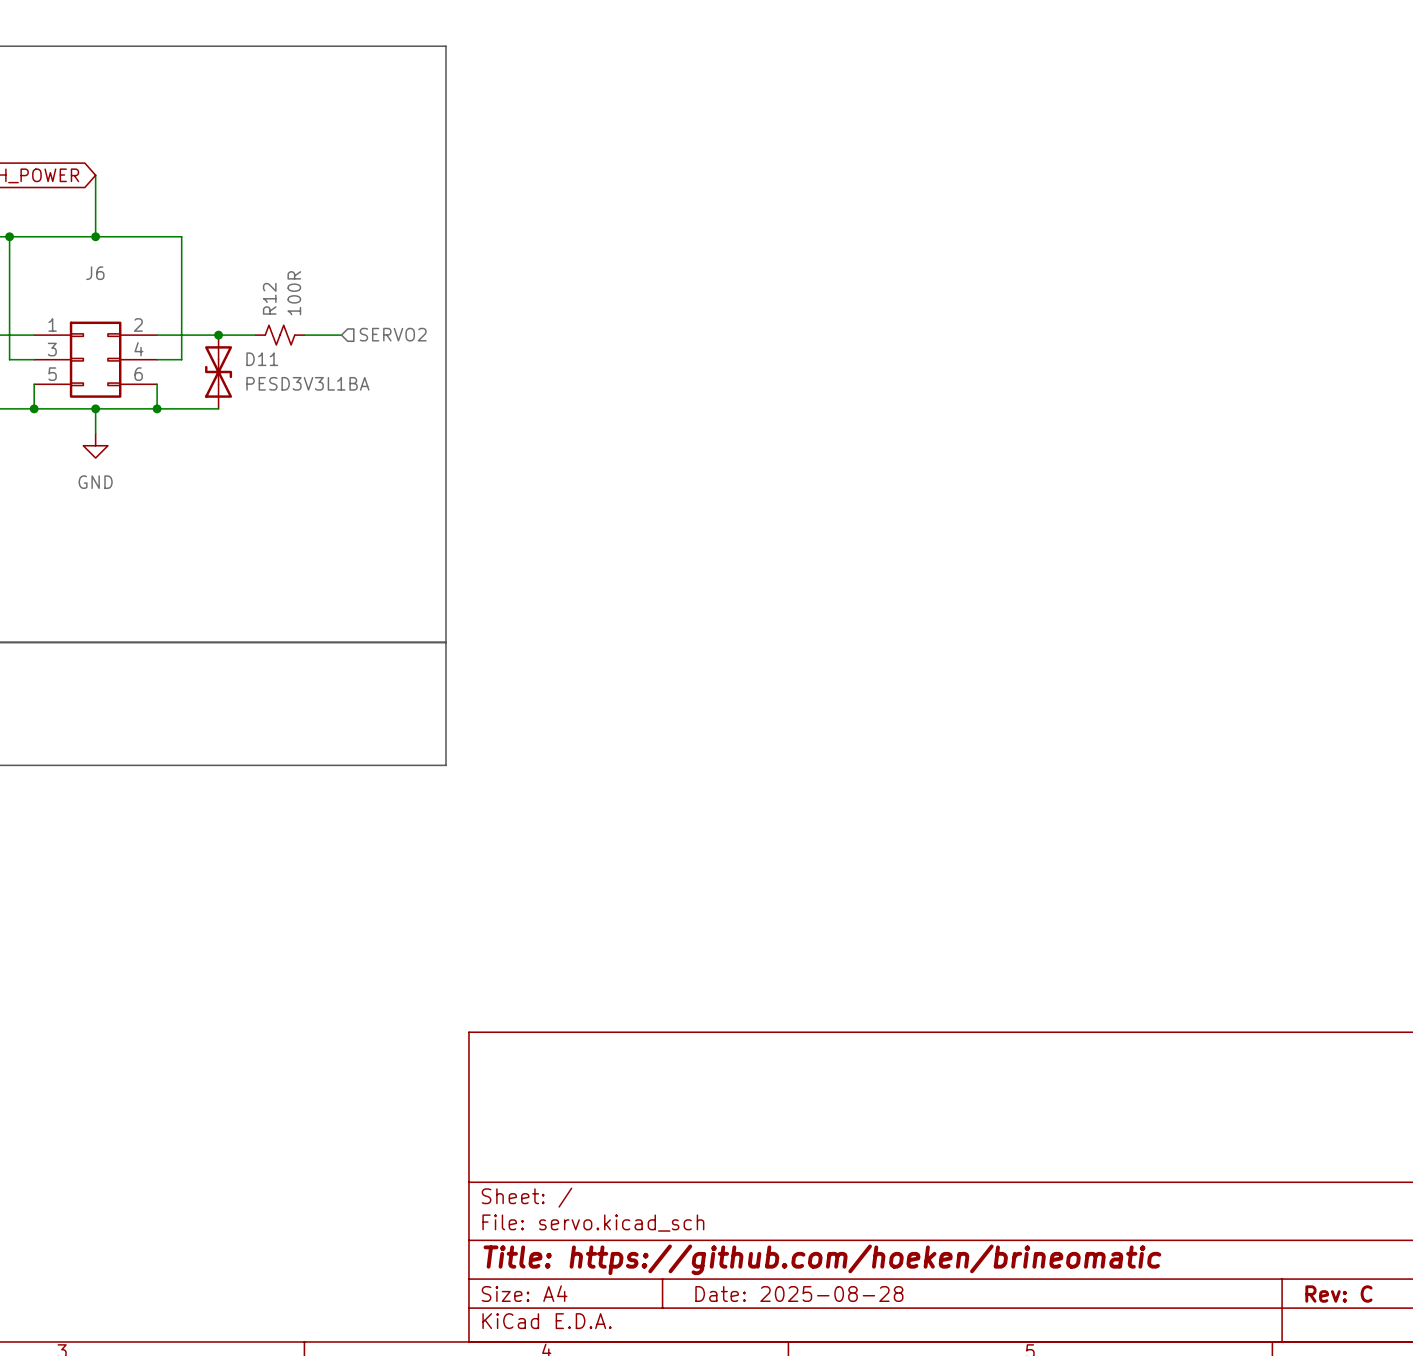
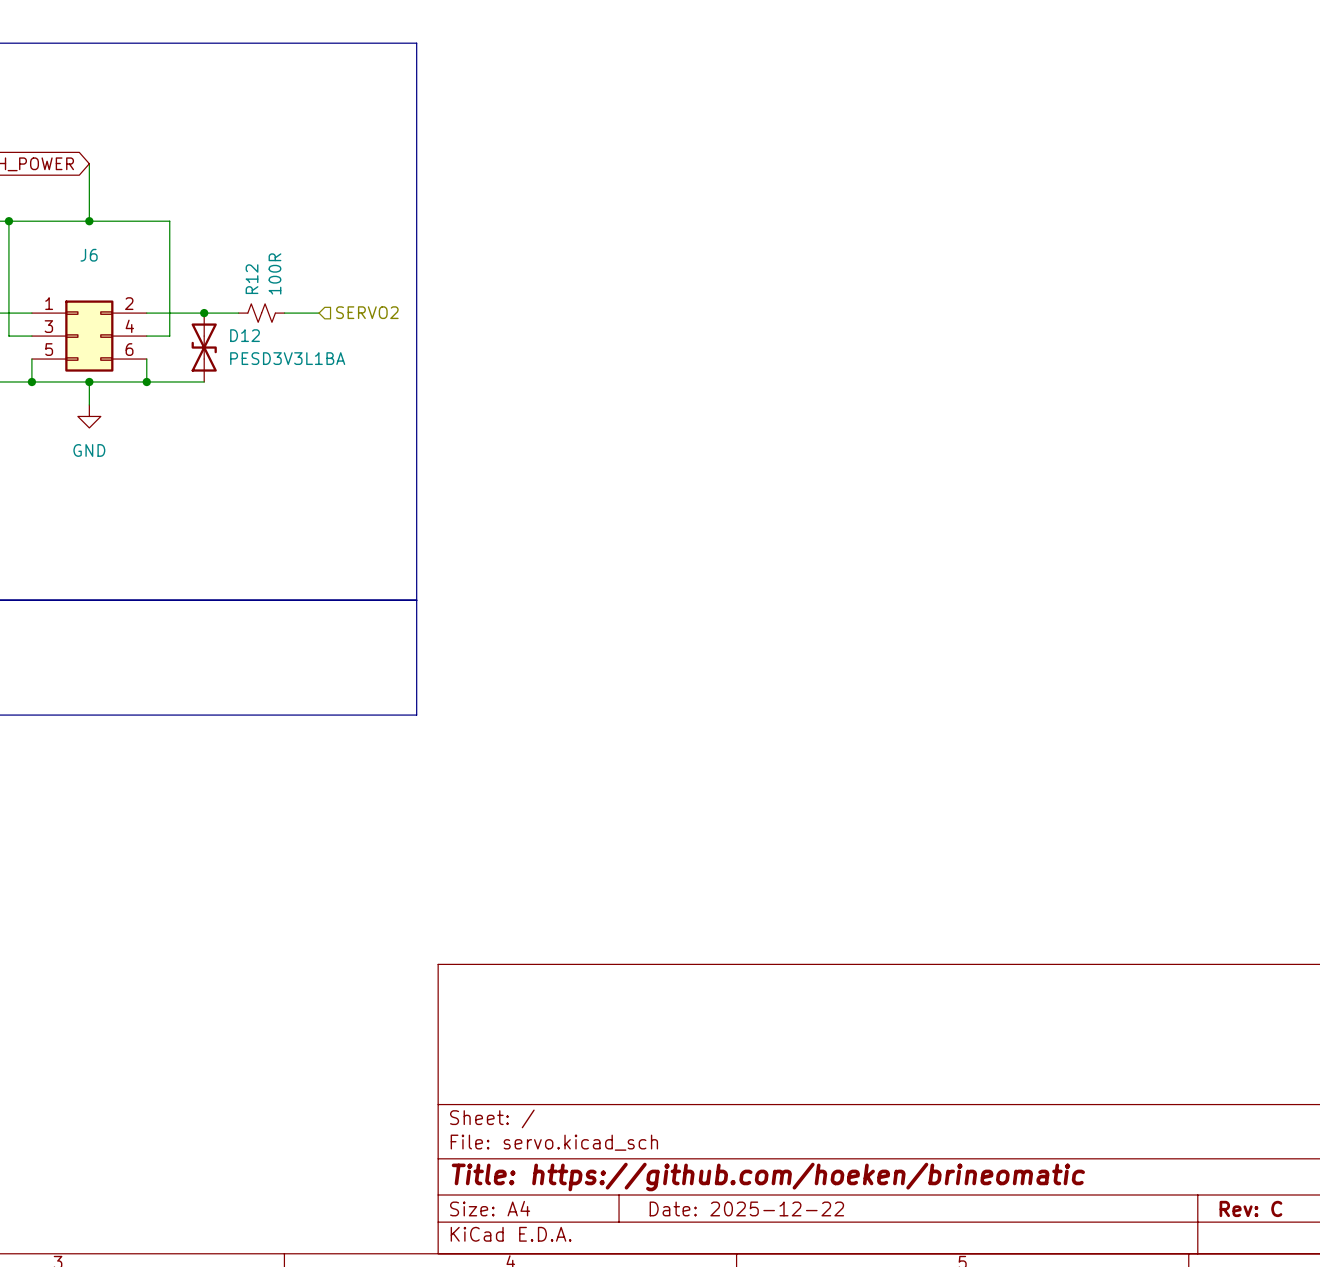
D11 name: D11 (262, 359) -> D12 (245, 335)
title block: Date: 2025-08-28 (799, 1294) -> Date: 2025-12-22 (746, 1208)

